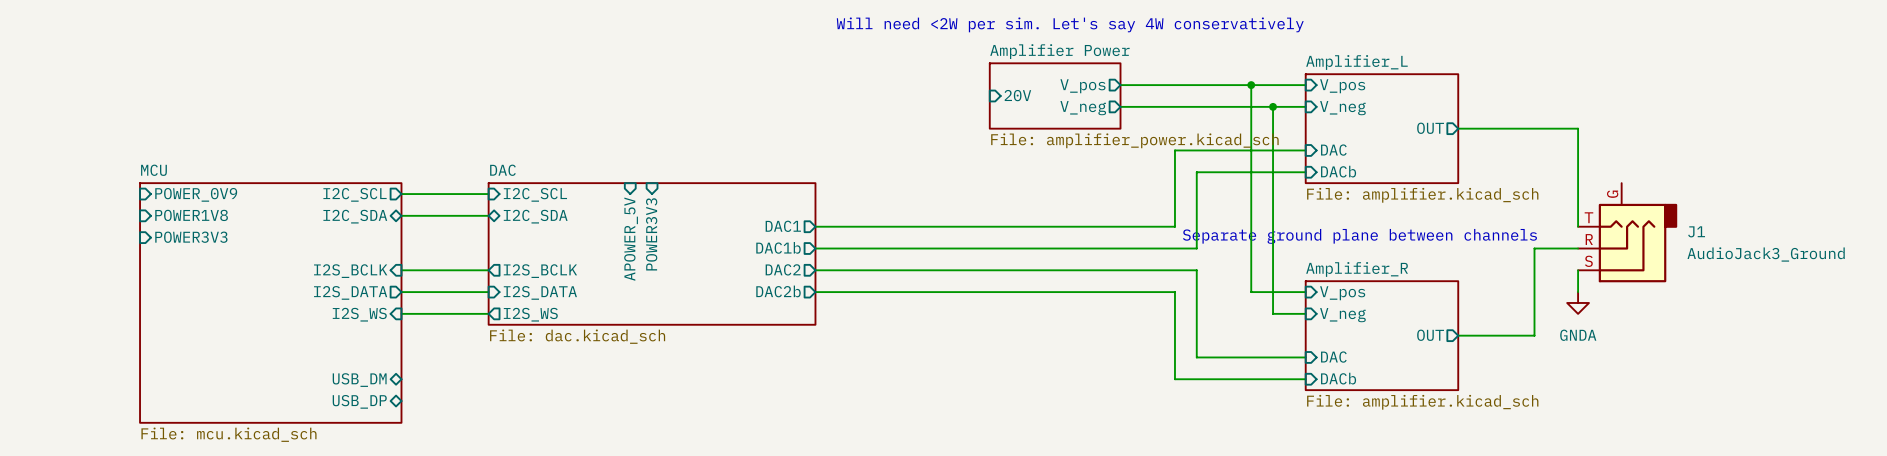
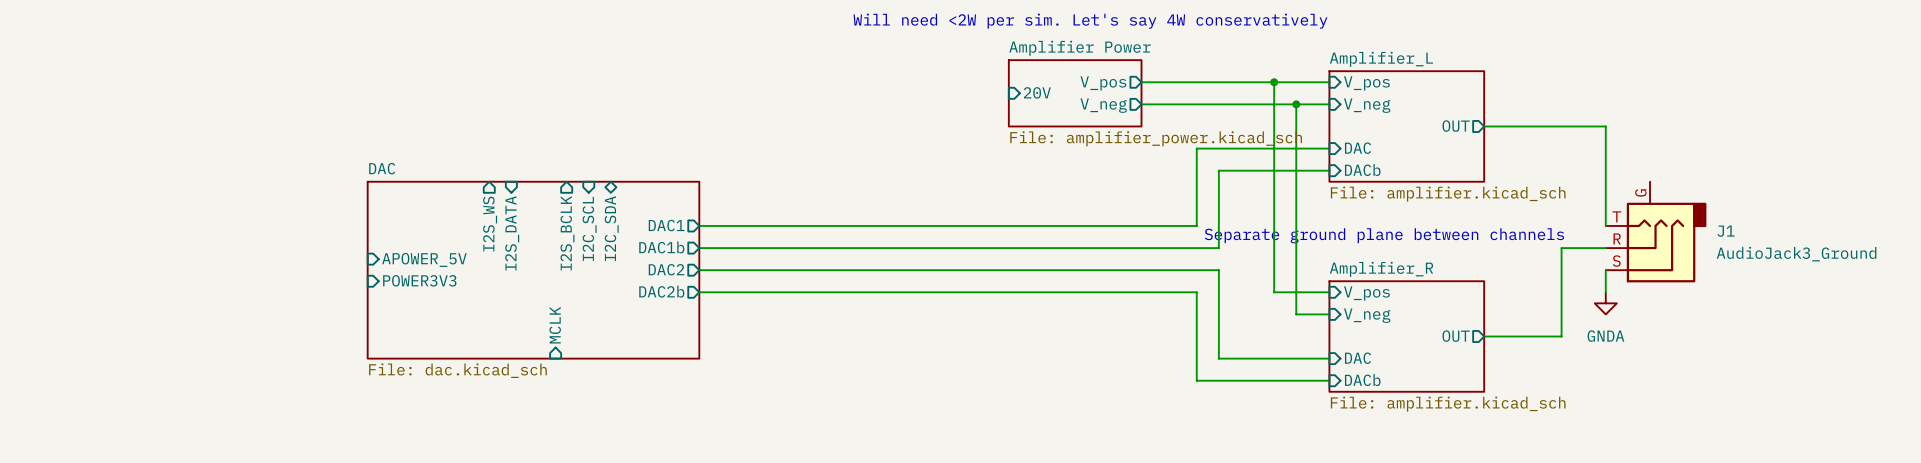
sheet pin: POWER_0V9 (196, 194) -> none
sheet pin: I2C_SCL (355, 194) -> none
wire: (401, 194) (488, 194) -> none
sheet pin rotation: 0° (535, 194) -> 90° clockwise (589, 228)
sheet pin: POWER1V8 (191, 215) -> none
wire: (401, 215) (488, 215) -> none
sheet pin: I2C_SDA (355, 216) -> none
sheet pin rotation: 0° (535, 216) -> 90° clockwise (611, 228)
sheet pin: none -> I2S_WS (490, 224)
wire: none -> (699, 225) (831, 225)
sheet pin position: DAC1 (783, 226) -> DAC1 (666, 225)
sheet pin: POWER3V3 (651, 234) -> none
sheet pin: POWER3V3 (191, 237) -> none
sheet pin: APOWER_5V (631, 239) -> none
sheet pin position: DAC1b (778, 247) -> DAC1b (661, 247)
wire: none -> (699, 248) (831, 248)
sheet DAC: File: dac.kicad_sch (652, 253) -> none
sheet pin: none -> APOWER_5V (424, 259)
sheet pin position: DAC2 (783, 269) -> DAC2 (666, 269)
wire: (401, 270) (488, 270) -> none
sheet DAC: none -> File: dac.kicad_sch (533, 270)
wire: none -> (699, 270) (831, 270)
sheet pin: I2S_BCLK (350, 271) -> none
sheet pin rotation: 0° (540, 271) -> 90° clockwise (567, 233)
sheet pin: none -> POWER3V3 (419, 280)
sheet pin position: DAC2b (778, 291) -> DAC2b (661, 291)
sheet pin: I2S_DATA (350, 292) -> none
wire: (401, 292) (488, 292) -> none
sheet pin rotation: 0° (540, 292) -> 90° clockwise (512, 233)
wire: none -> (699, 292) (831, 292)
sheet MCU: File: mcu.kicad_sch (270, 302) -> none
wire: (401, 313) (488, 313) -> none
sheet pin: I2S_WS (359, 314) -> none
sheet pin: I2S_WS (530, 314) -> none
sheet pin: none -> MCLK (555, 325)
sheet pin: USB_DM (359, 380) -> none
sheet pin: USB_DP (359, 401) -> none

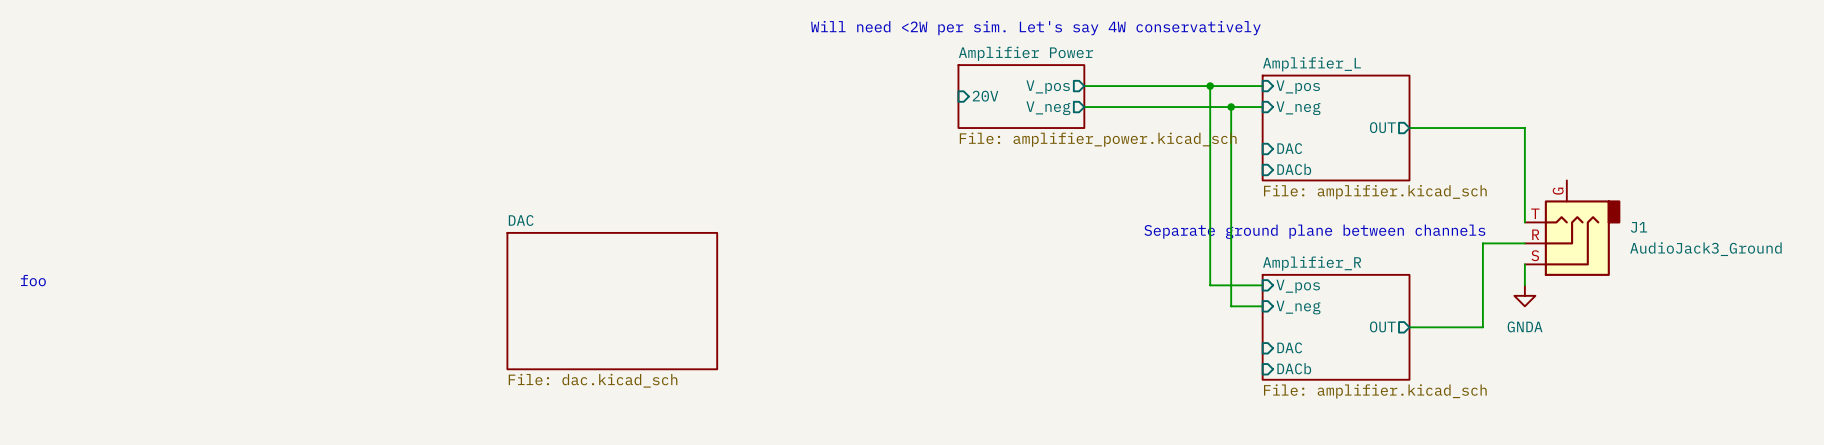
wire: (1329, 148) (1196, 148) (1196, 225) (699, 225) -> none
wire: (1329, 170) (1218, 170) (1218, 248) (699, 248) -> none
sheet pin: I2S_WS (490, 224) -> none
sheet pin: DAC1 (666, 225) -> none
sheet pin: I2C_SCL (589, 228) -> none
sheet pin: I2C_SDA (611, 228) -> none
sheet pin: I2S_DATA (512, 233) -> none
sheet pin: I2S_BCLK (567, 233) -> none
sheet pin: DAC1b (661, 247) -> none
sheet pin: APOWER_5V (424, 259) -> none
sheet pin: DAC2 (666, 269) -> none
sheet DAC: File: dac.kicad_sch (533, 270) -> none
wire: (699, 270) (1218, 270) (1218, 358) (1329, 358) -> none
sheet pin: POWER3V3 (419, 280) -> none
text: none -> foo (33, 280)
sheet pin: DAC2b (661, 291) -> none
wire: (699, 292) (1196, 292) (1196, 380) (1329, 380) -> none
sheet DAC: none -> File: dac.kicad_sch (612, 301)
sheet pin: MCLK (555, 325) -> none

